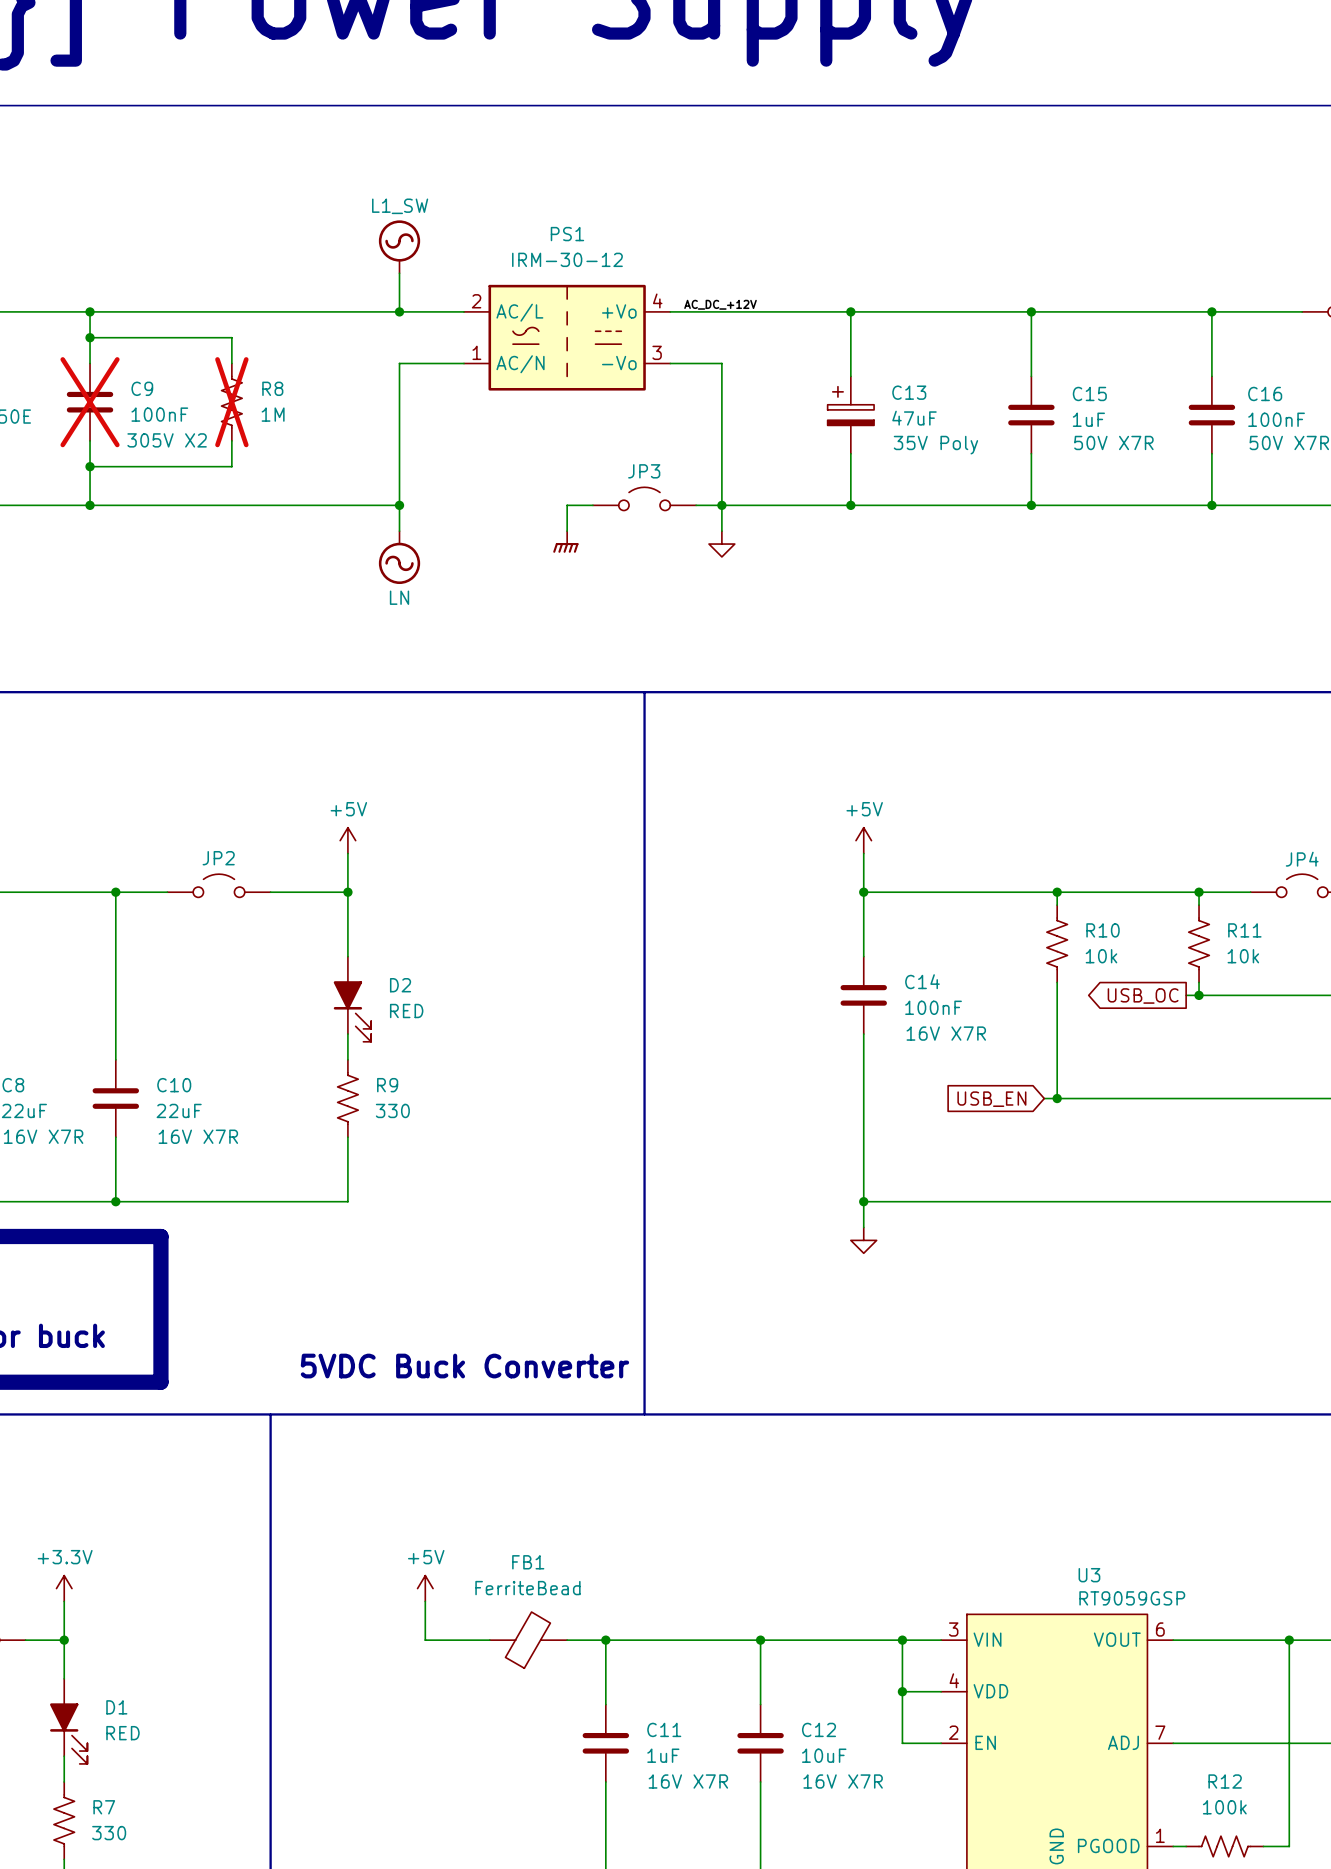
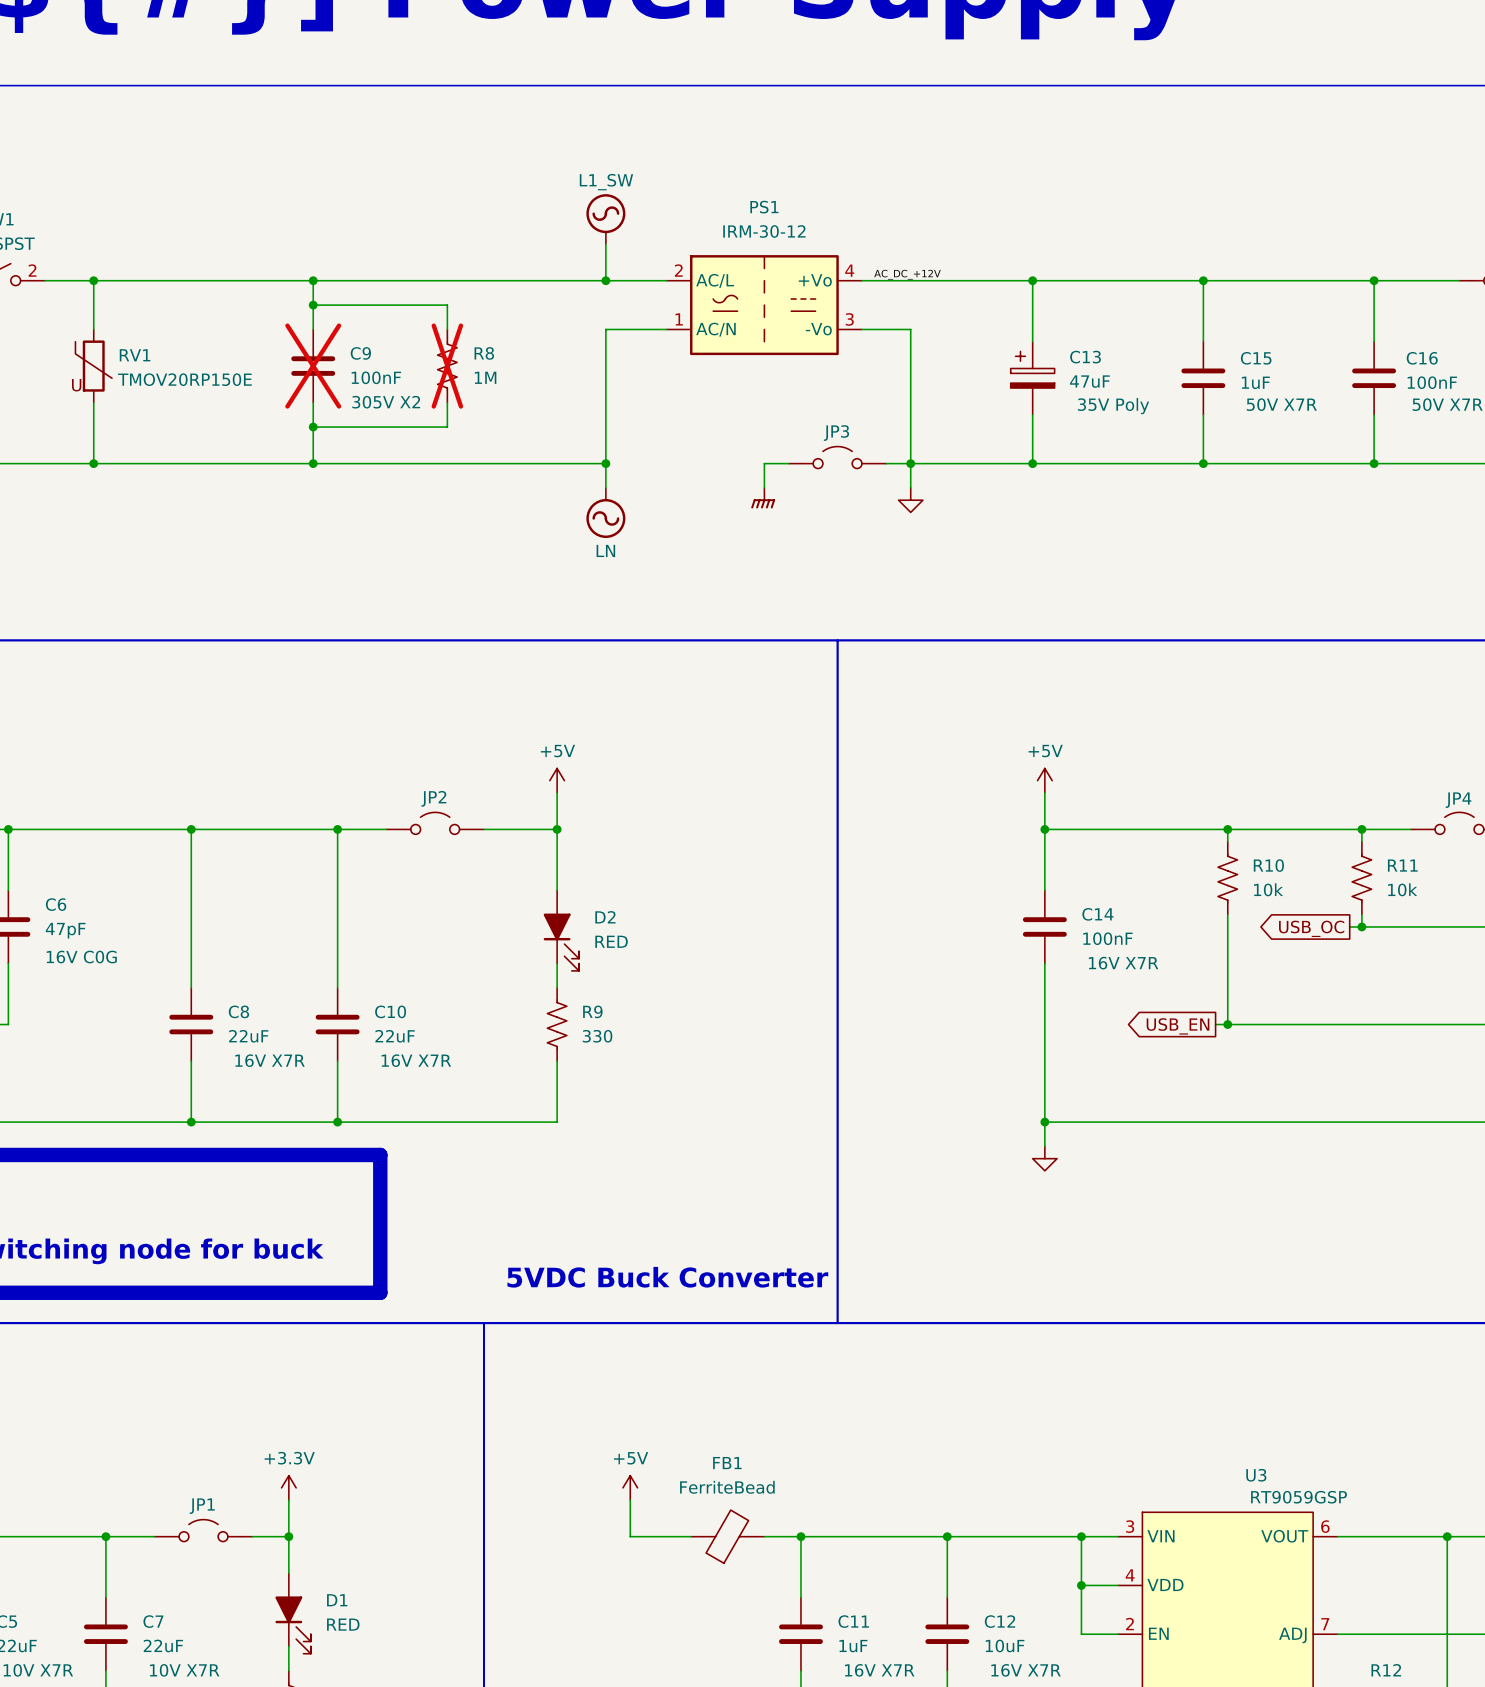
global label shape: input (991, 1099) -> output (1178, 1026)

